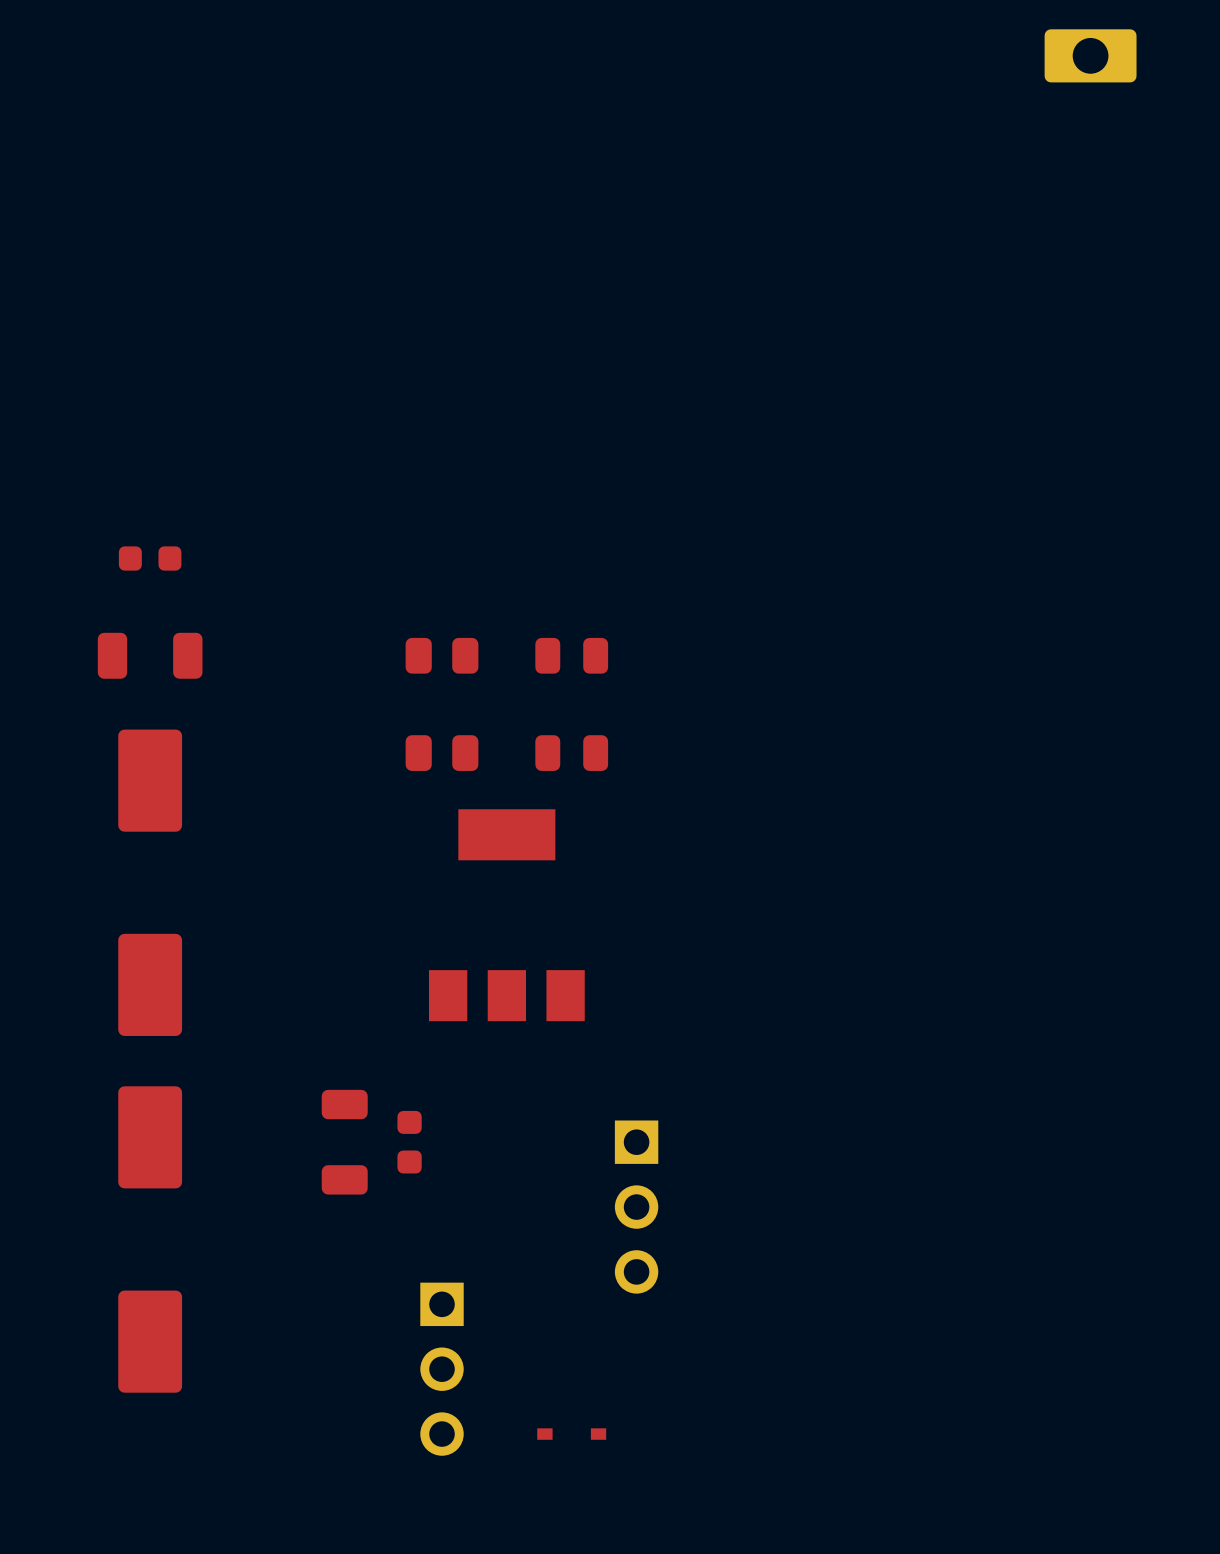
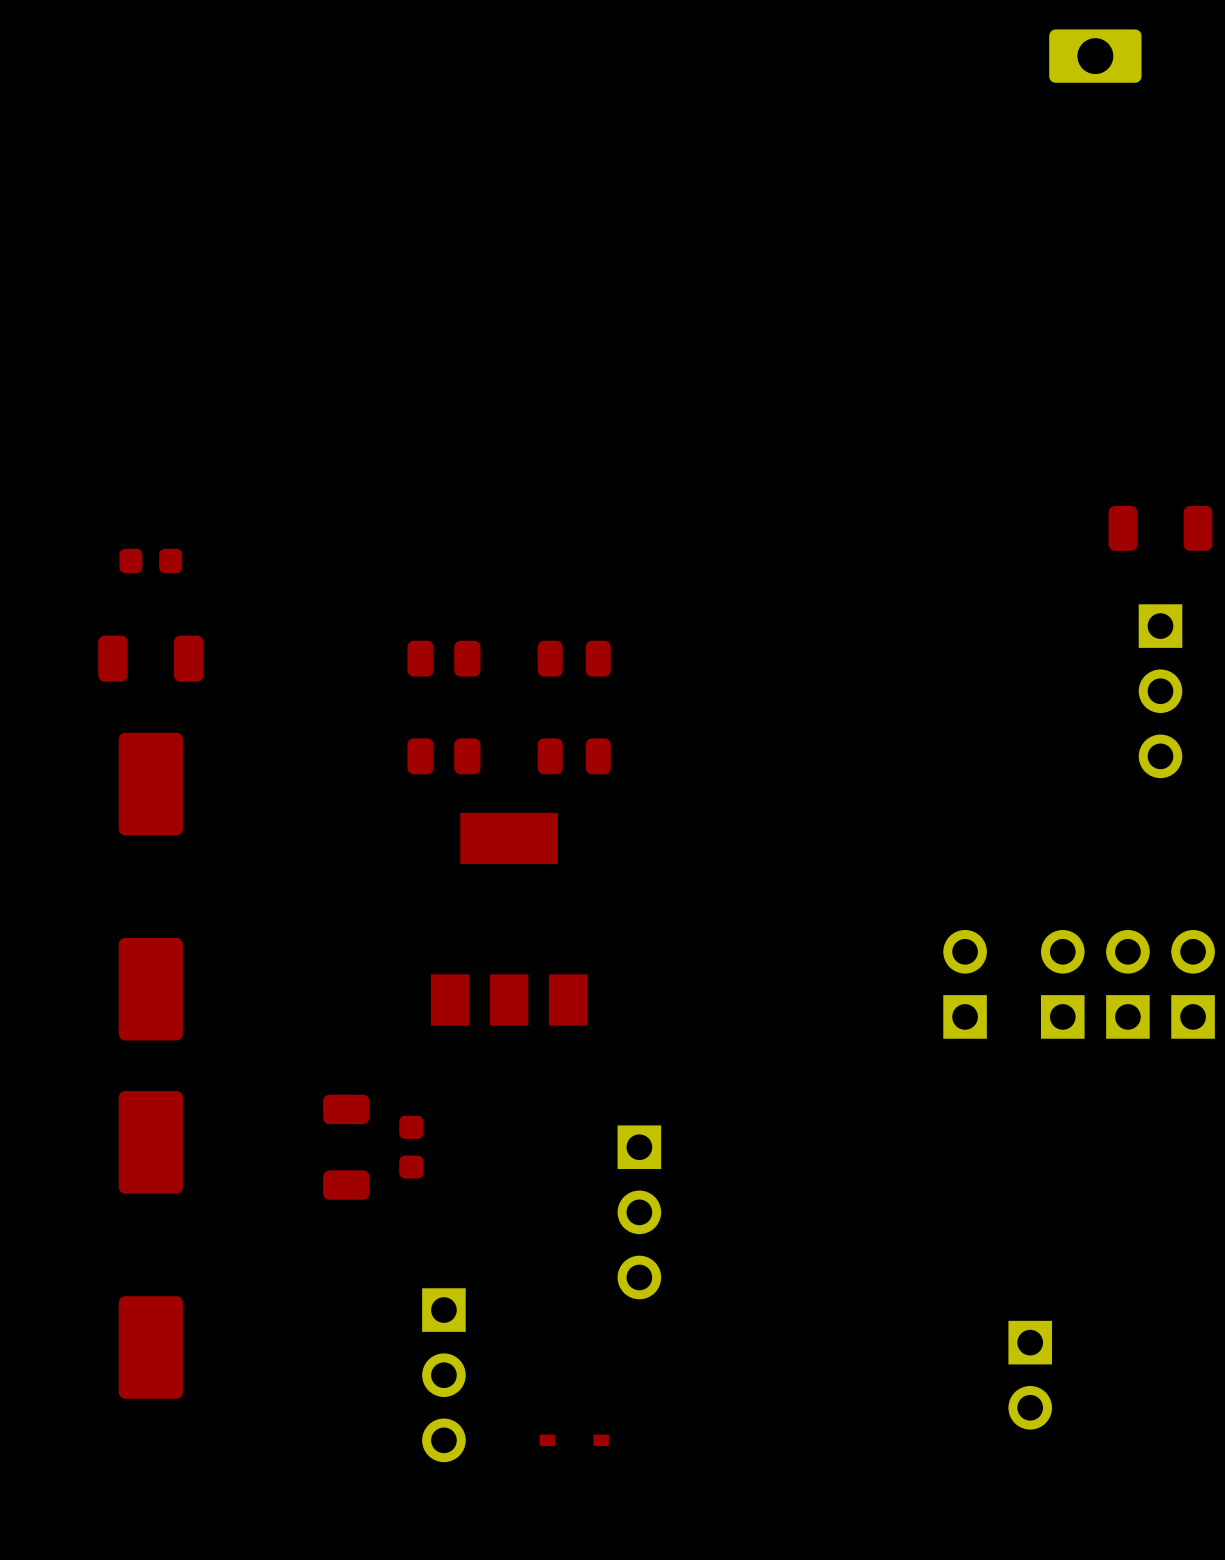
part: none -> (1160, 528)
part: none -> (1160, 691)
part: none -> (965, 984)
part: none -> (1062, 984)
part: none -> (1127, 984)
part: none -> (1193, 984)
part: none -> (1030, 1375)

